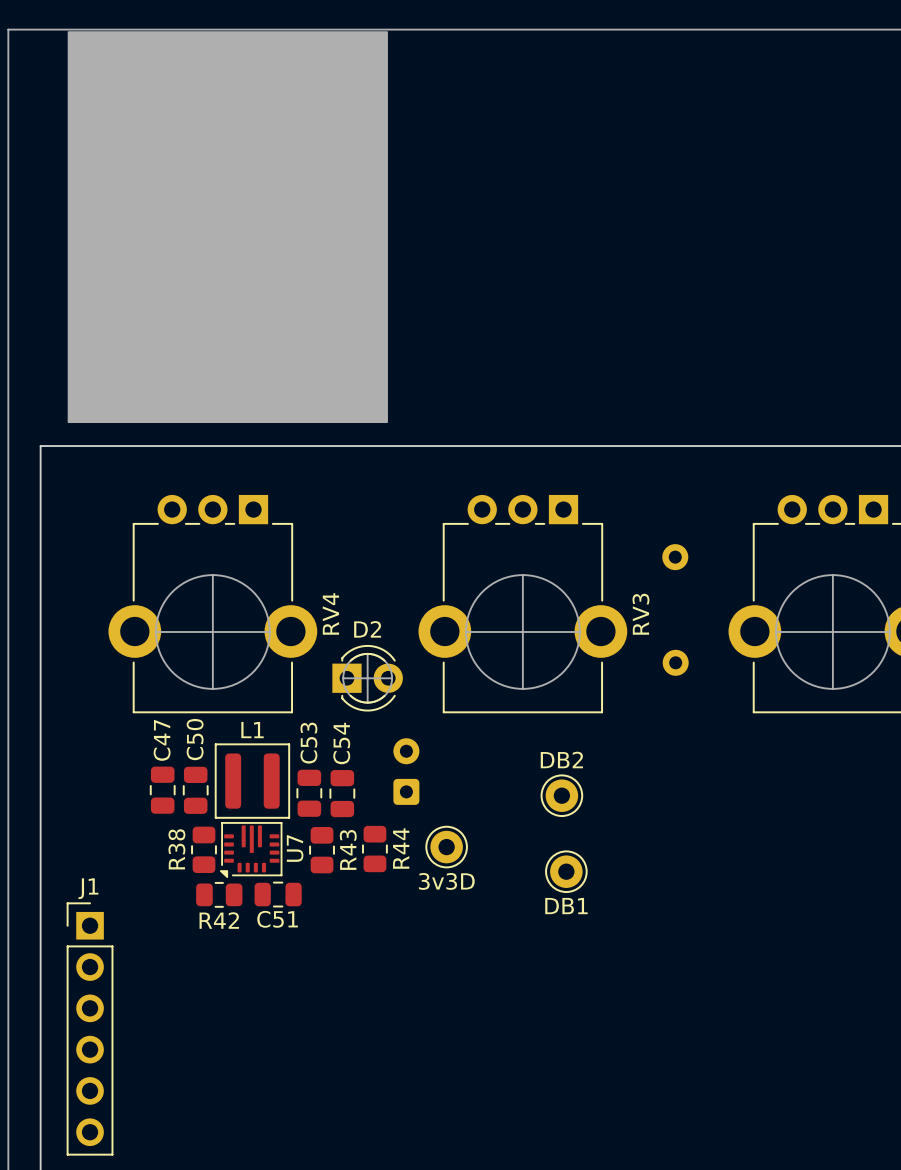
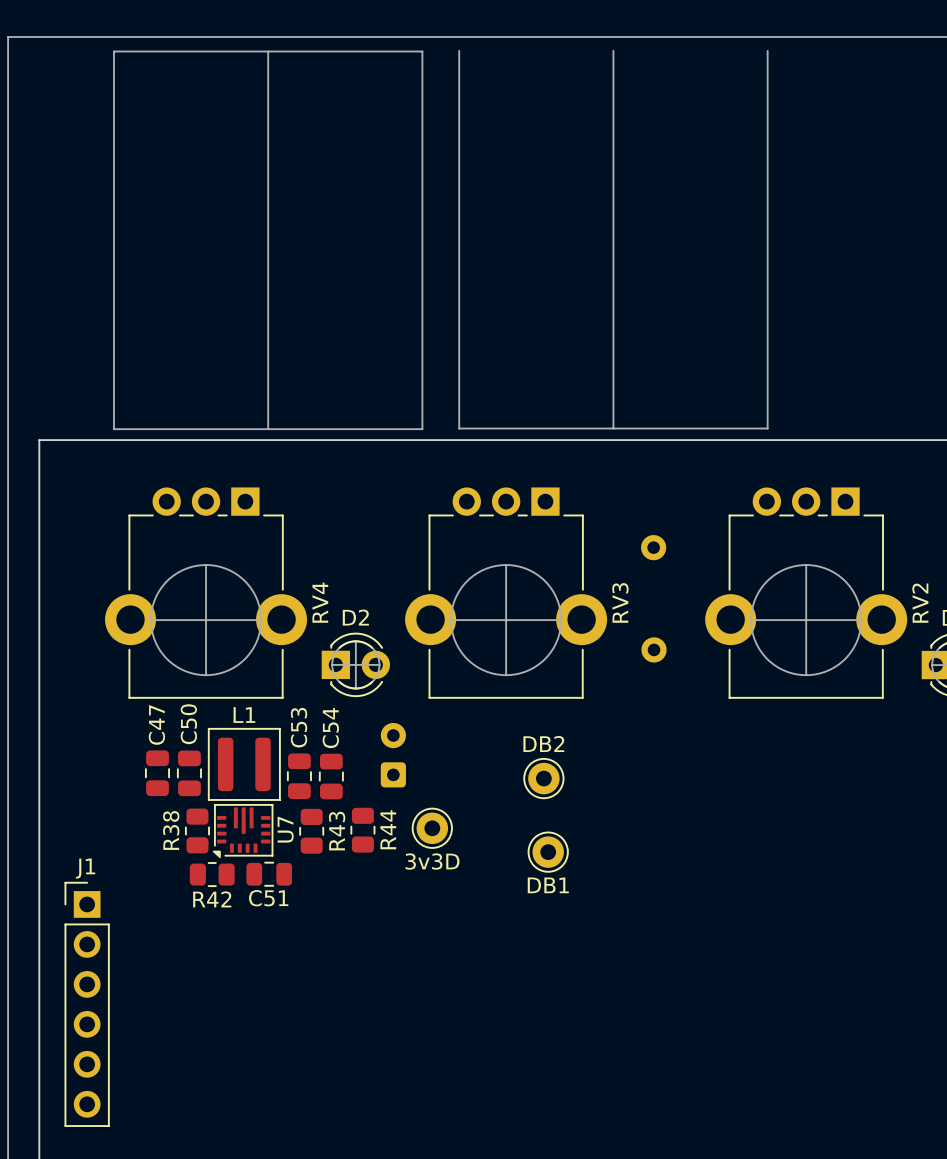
drawing: [67, 31, 388, 424] -> none
line: none -> (459, 50) (459, 428) (767, 428) (767, 50)
line: none -> (613, 50) (613, 428)
line: none -> (113, 51) (422, 51) (422, 429) (113, 429) (113, 51)
line: none -> (268, 51) (268, 429)

